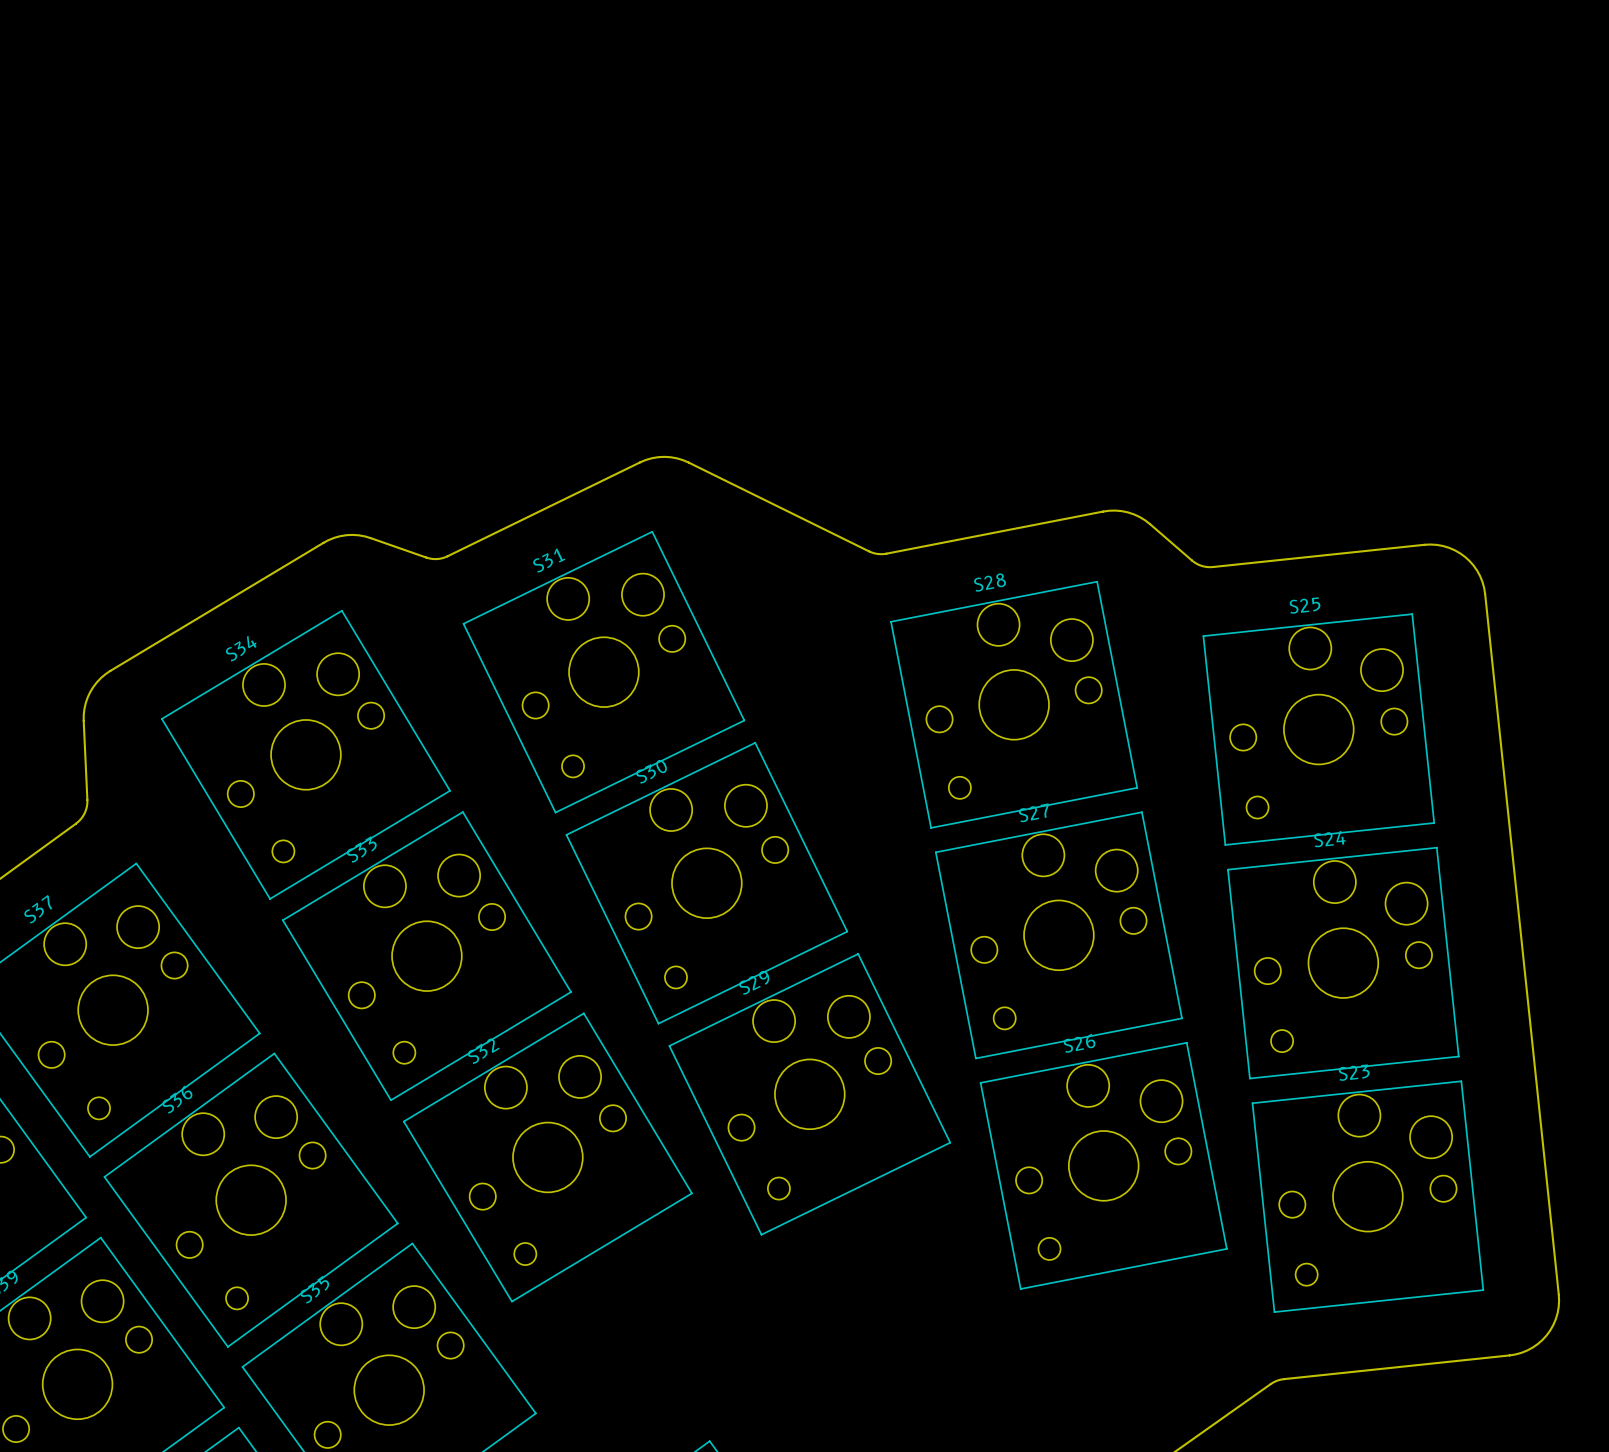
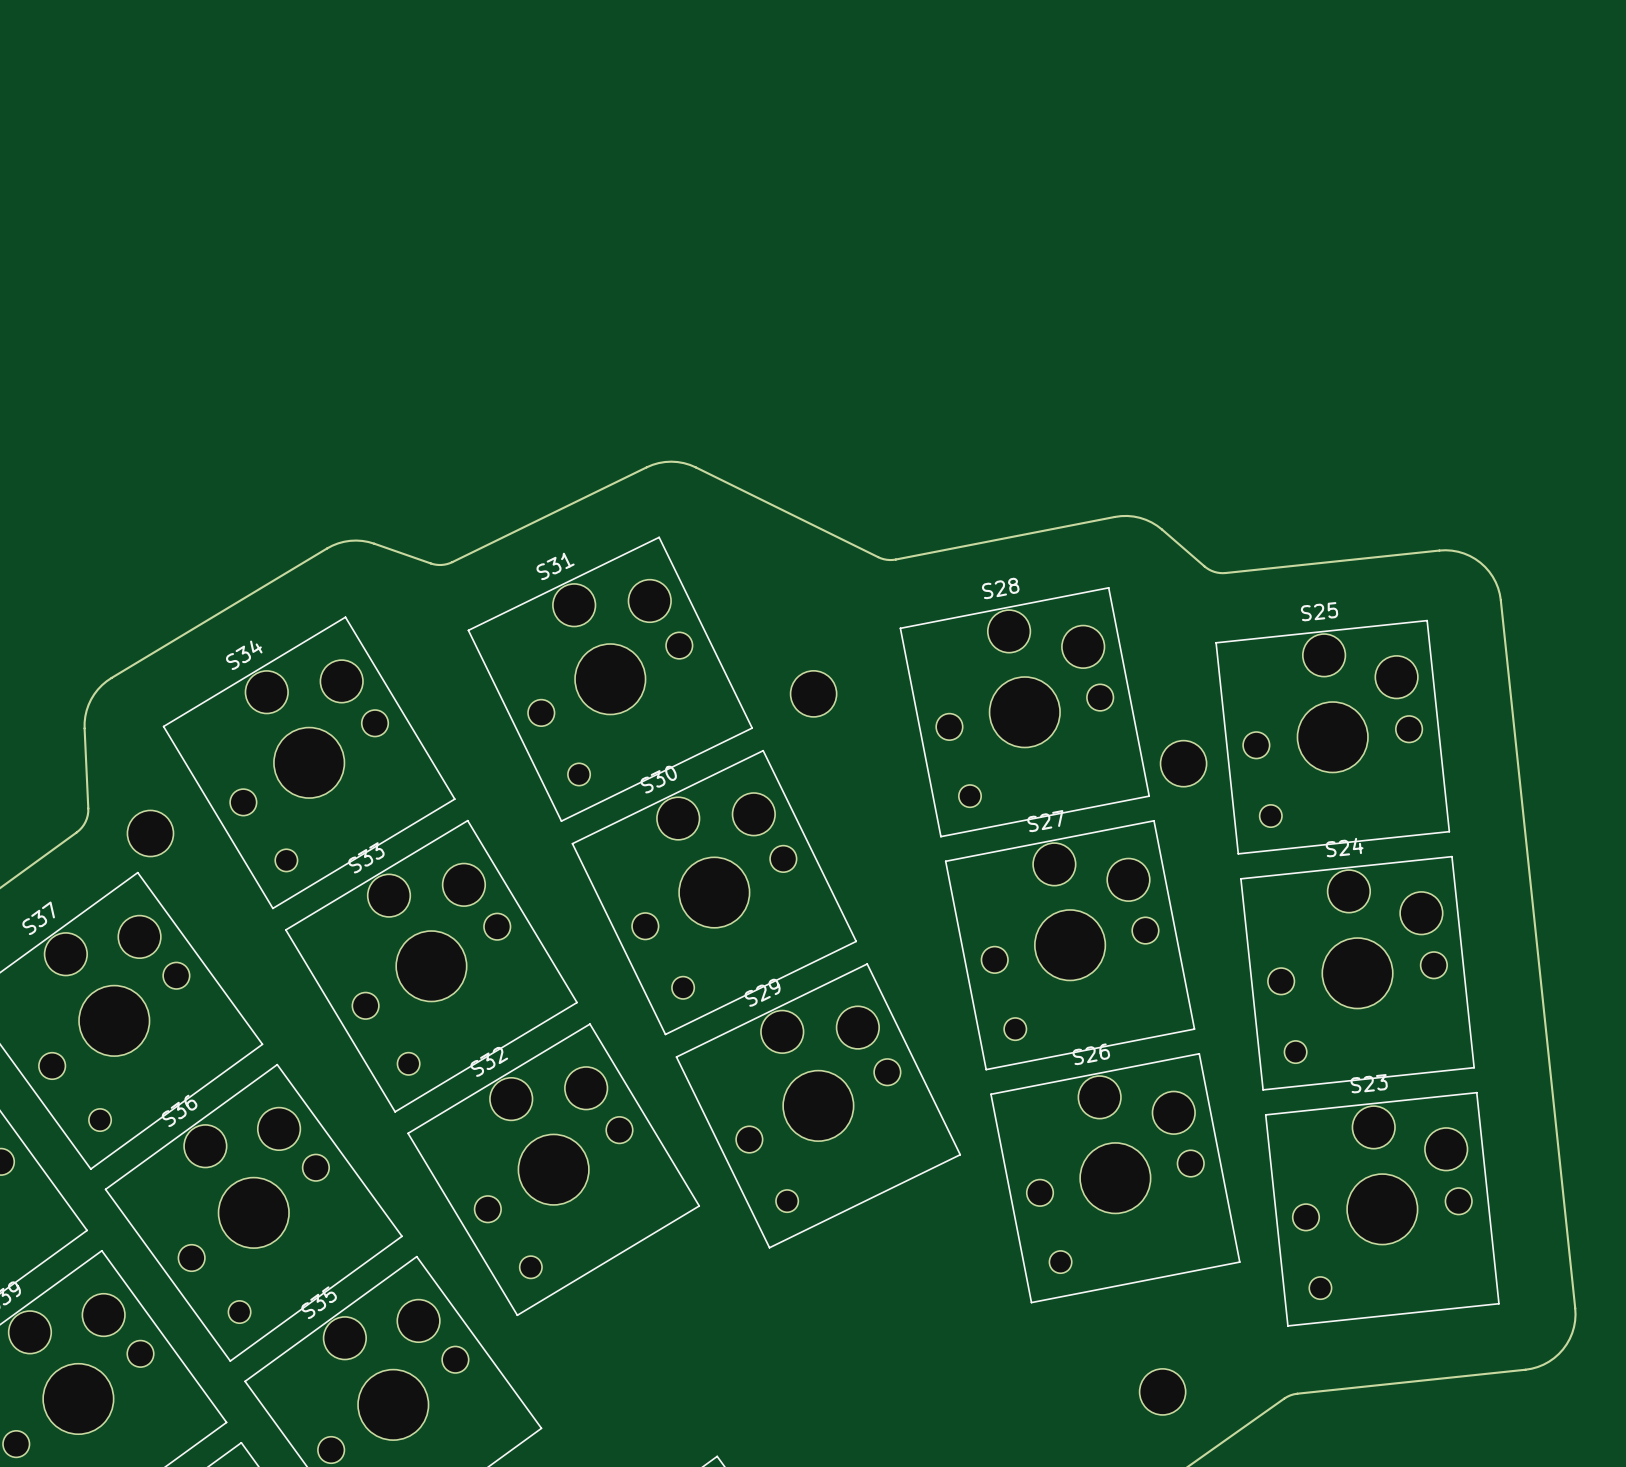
part: none -> (813, 693)
part: none -> (1183, 763)
part: none -> (150, 833)
part: none -> (1162, 1391)

